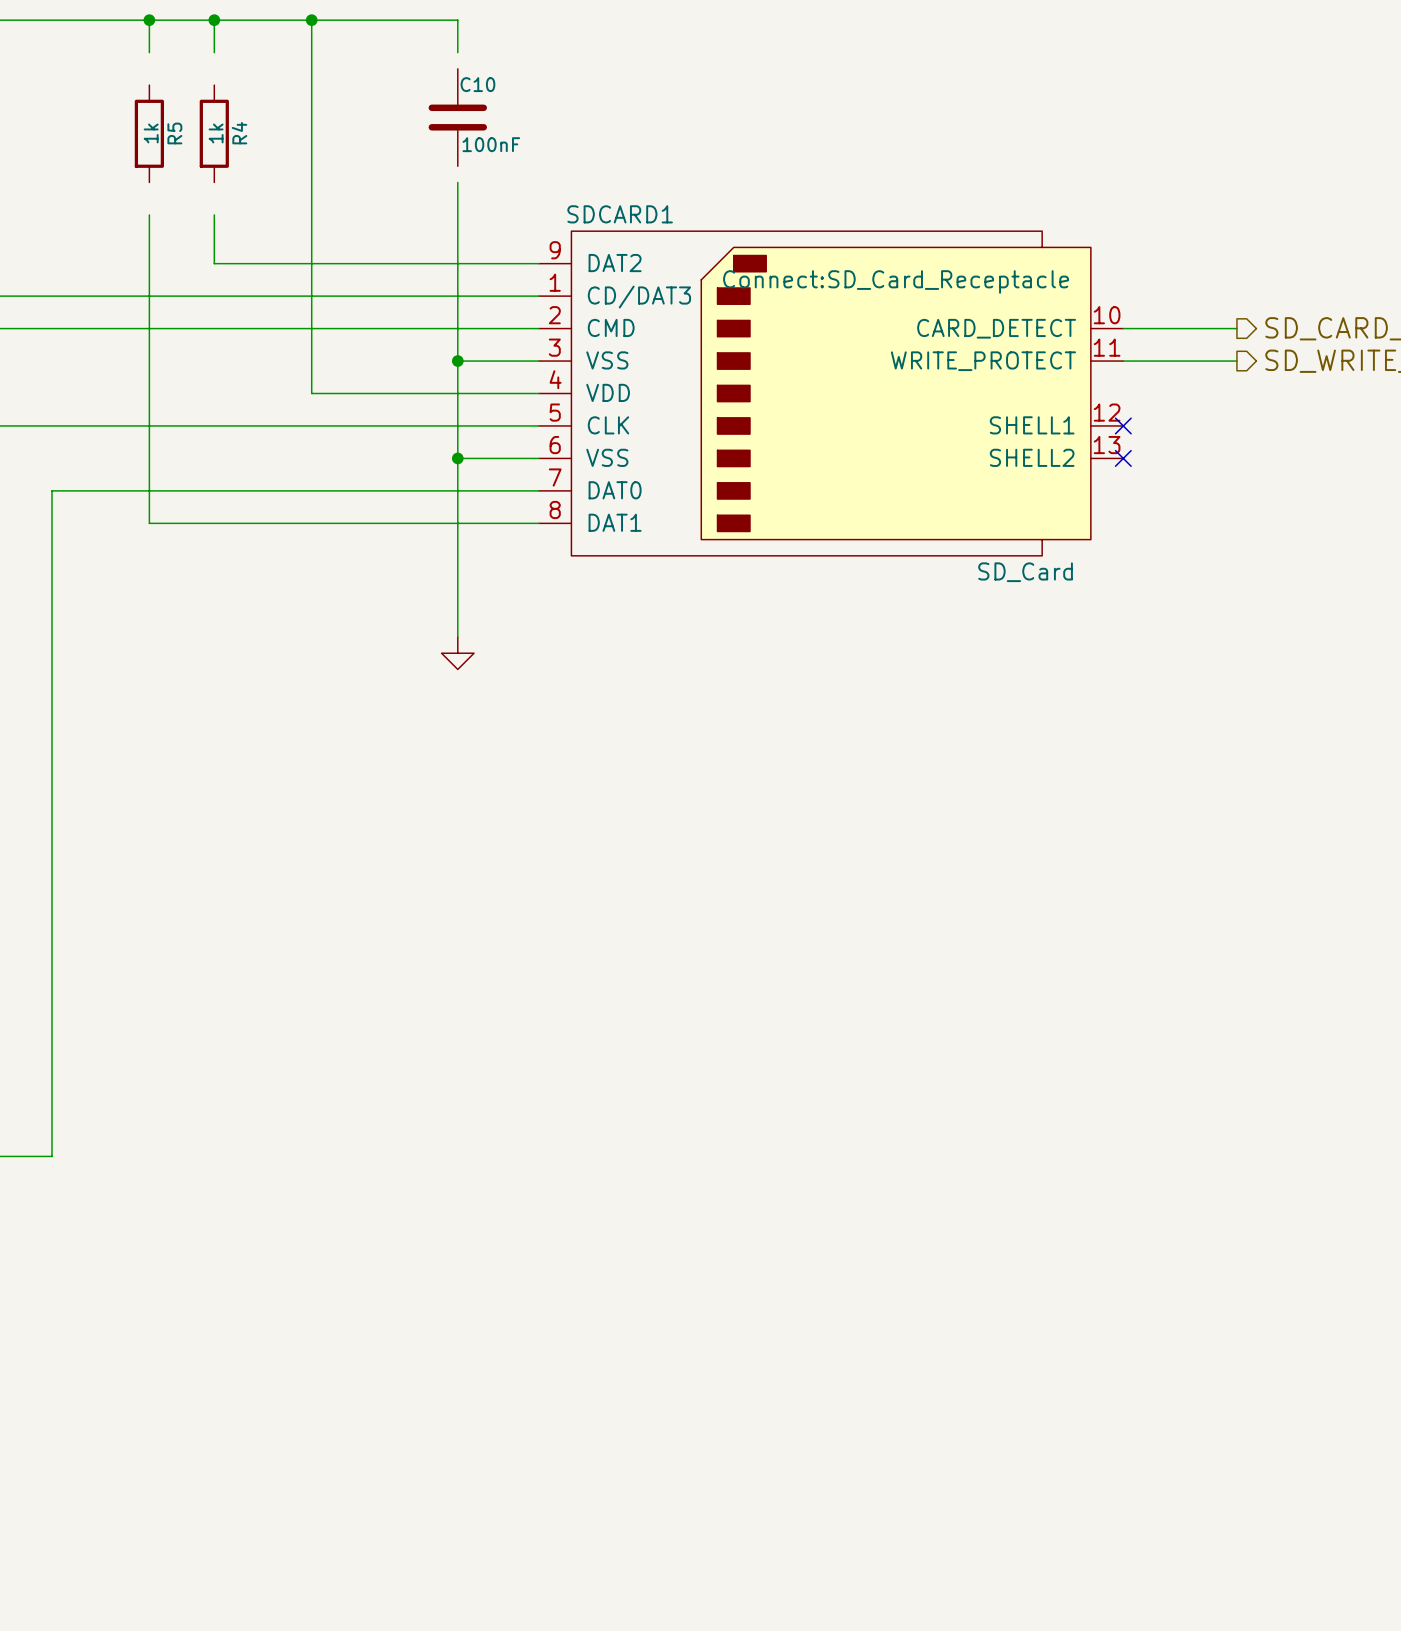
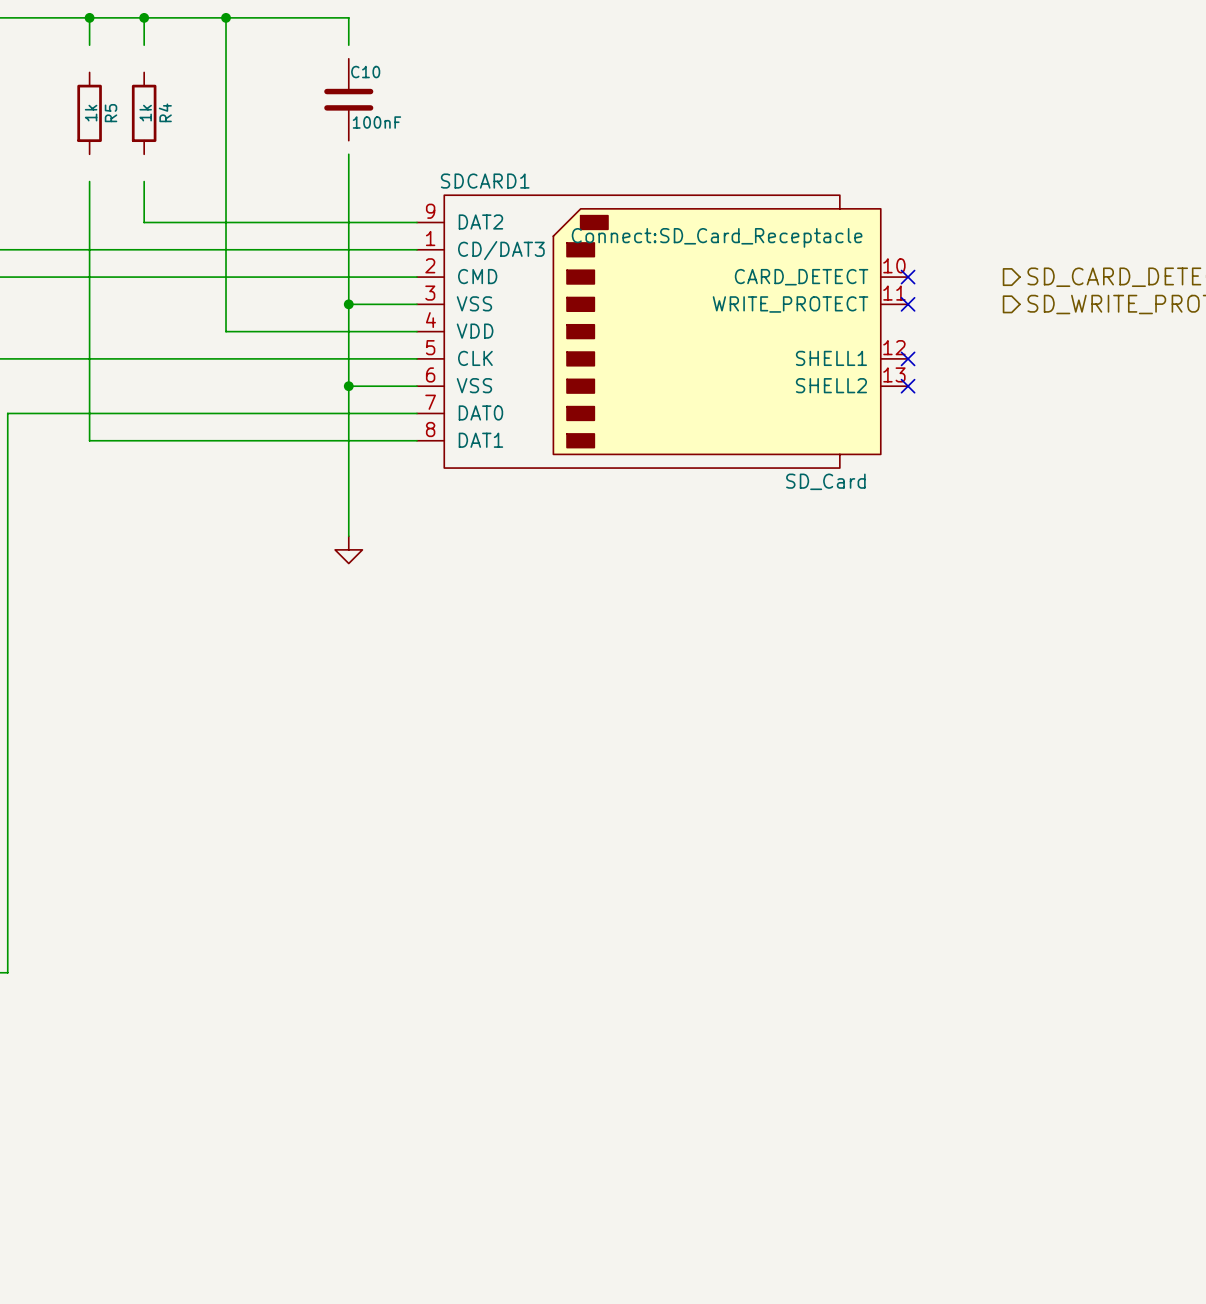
wire: (1123, 328) (1236, 328) -> none
no-connect mark: none -> (908, 277)
wire: (1123, 361) (1236, 361) -> none
no-connect mark: none -> (908, 304)

